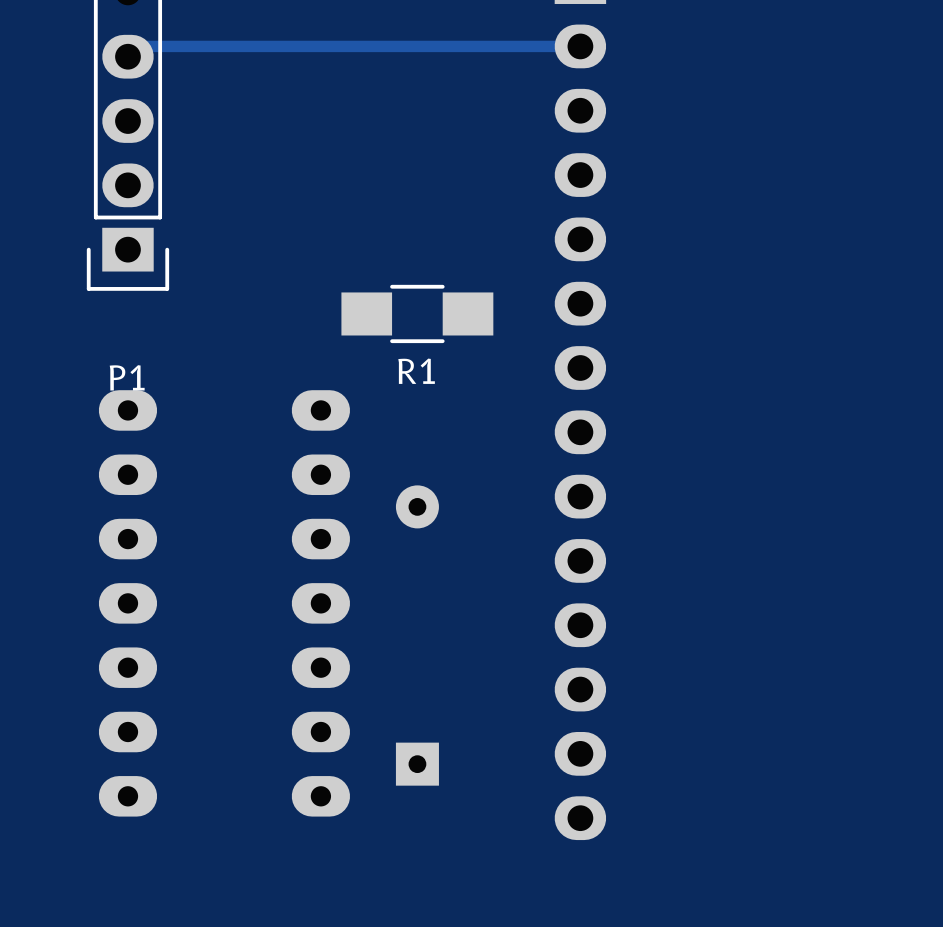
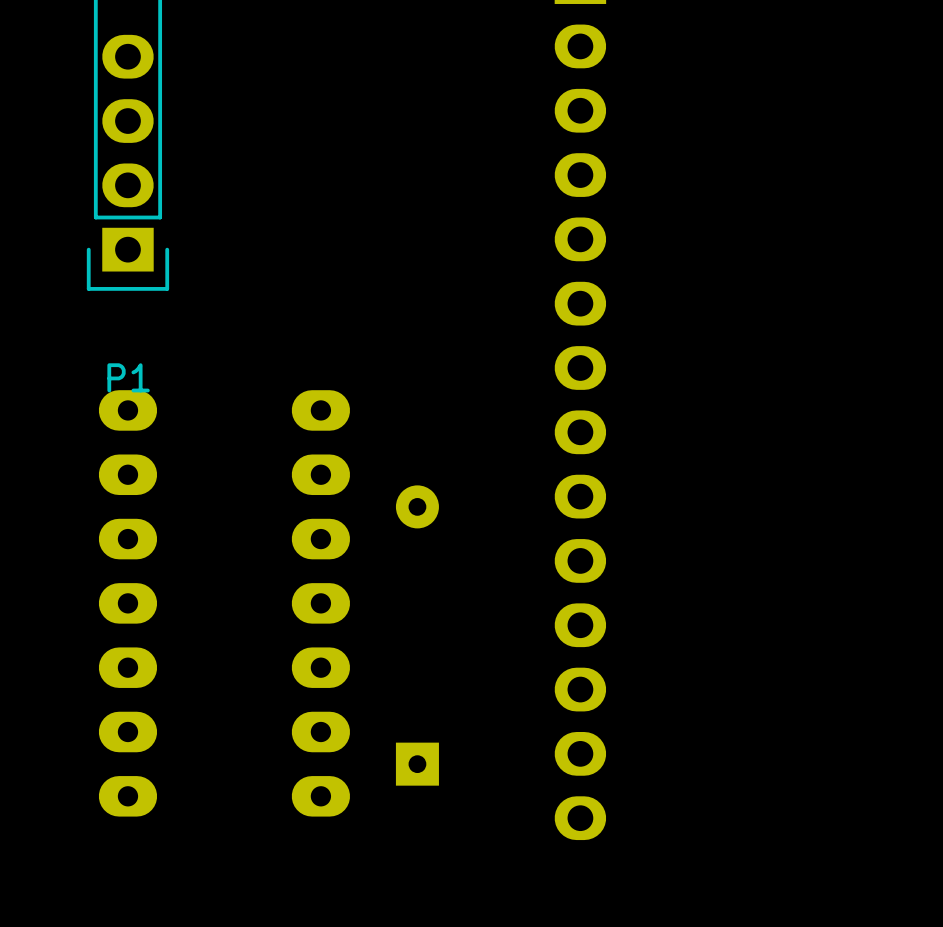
track: (580, 46) (138, 46) (127, 56) -> none
R1: (417, 313) -> none

